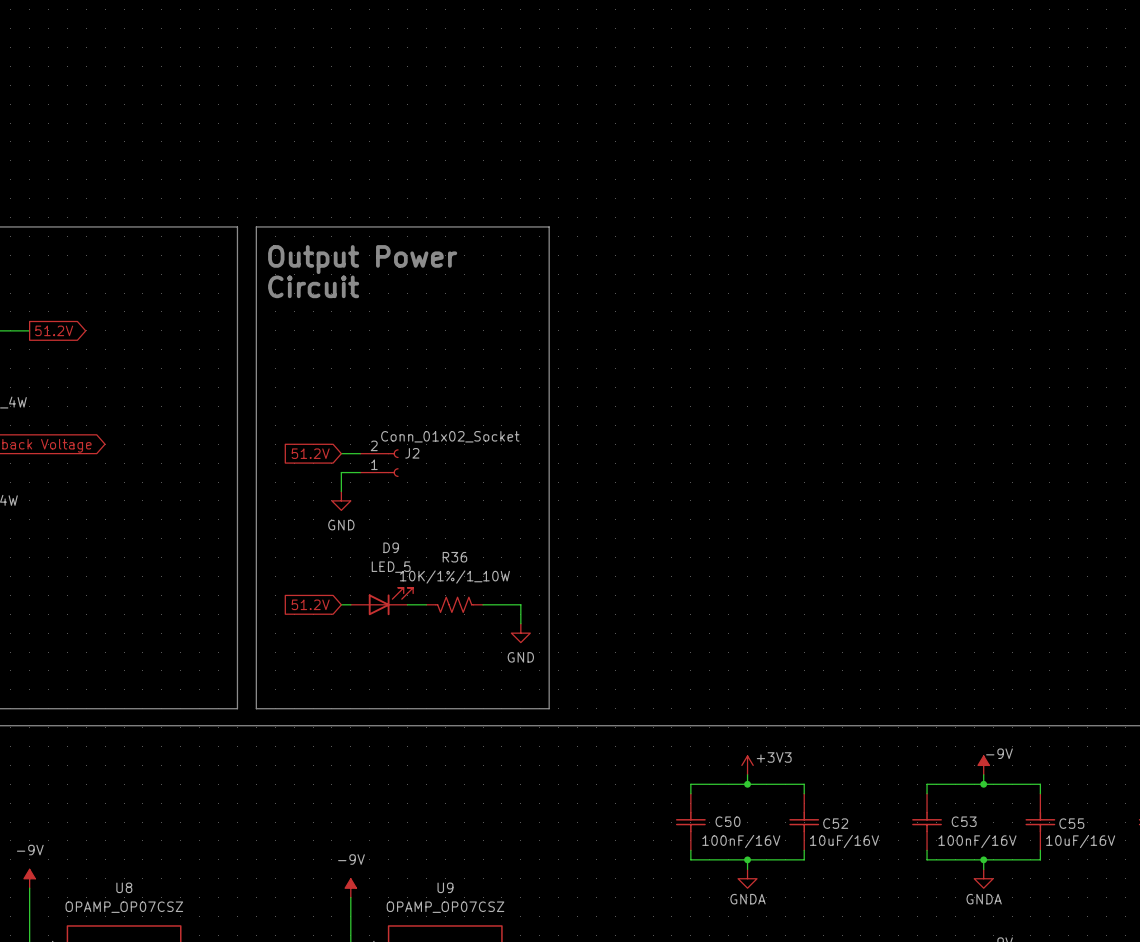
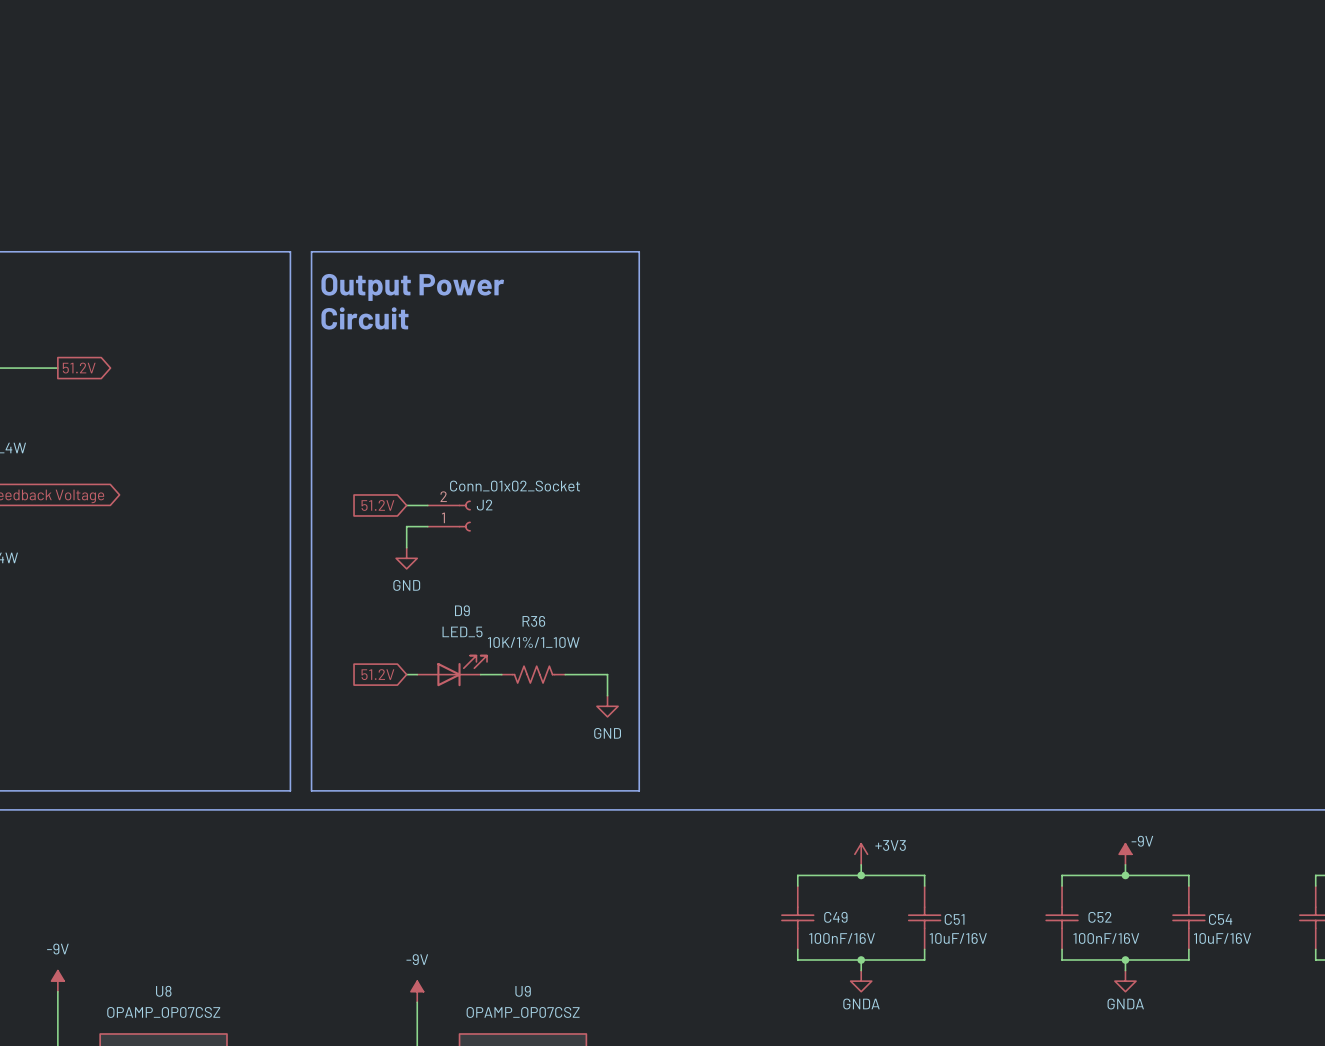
C50 name: C50 (728, 821) -> C49 (835, 917)
C53 name: C53 (964, 821) -> C52 (1100, 917)
C52 name: C52 (835, 823) -> C51 (954, 919)
C55 name: C55 (1071, 823) -> C54 (1220, 919)

